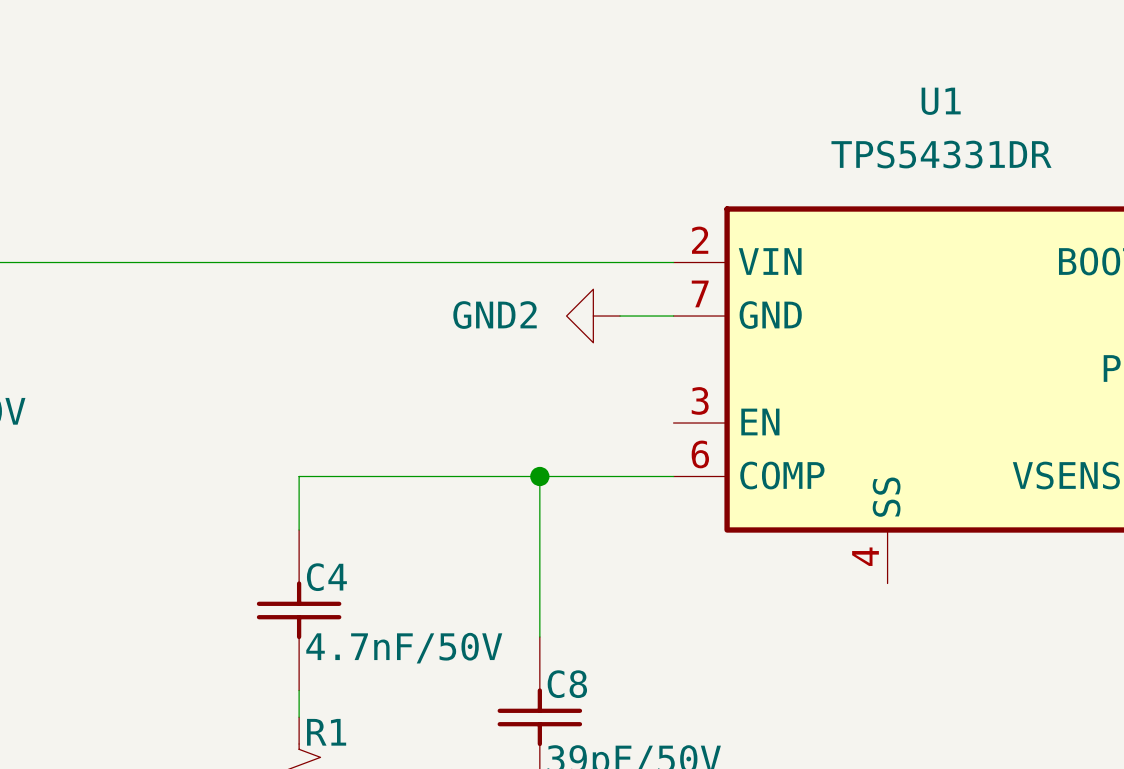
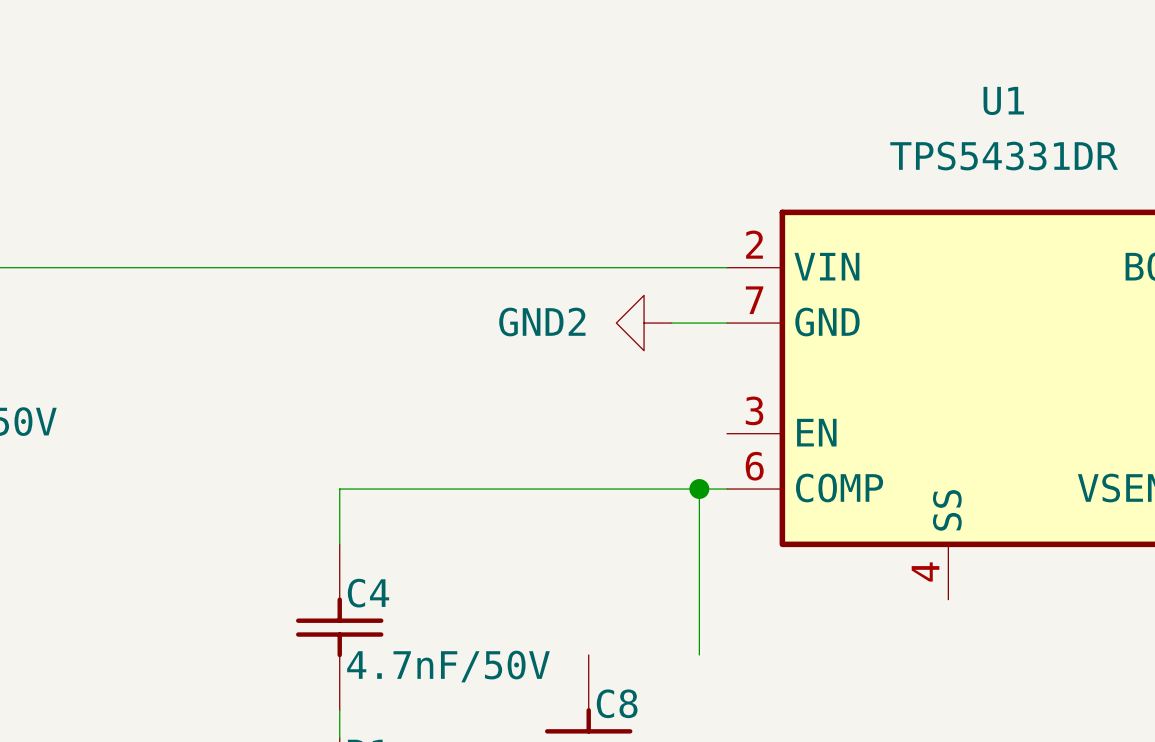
wire: (539, 476) (539, 636) -> (699, 489) (699, 655)
junction position: (539, 476) -> (699, 489)

